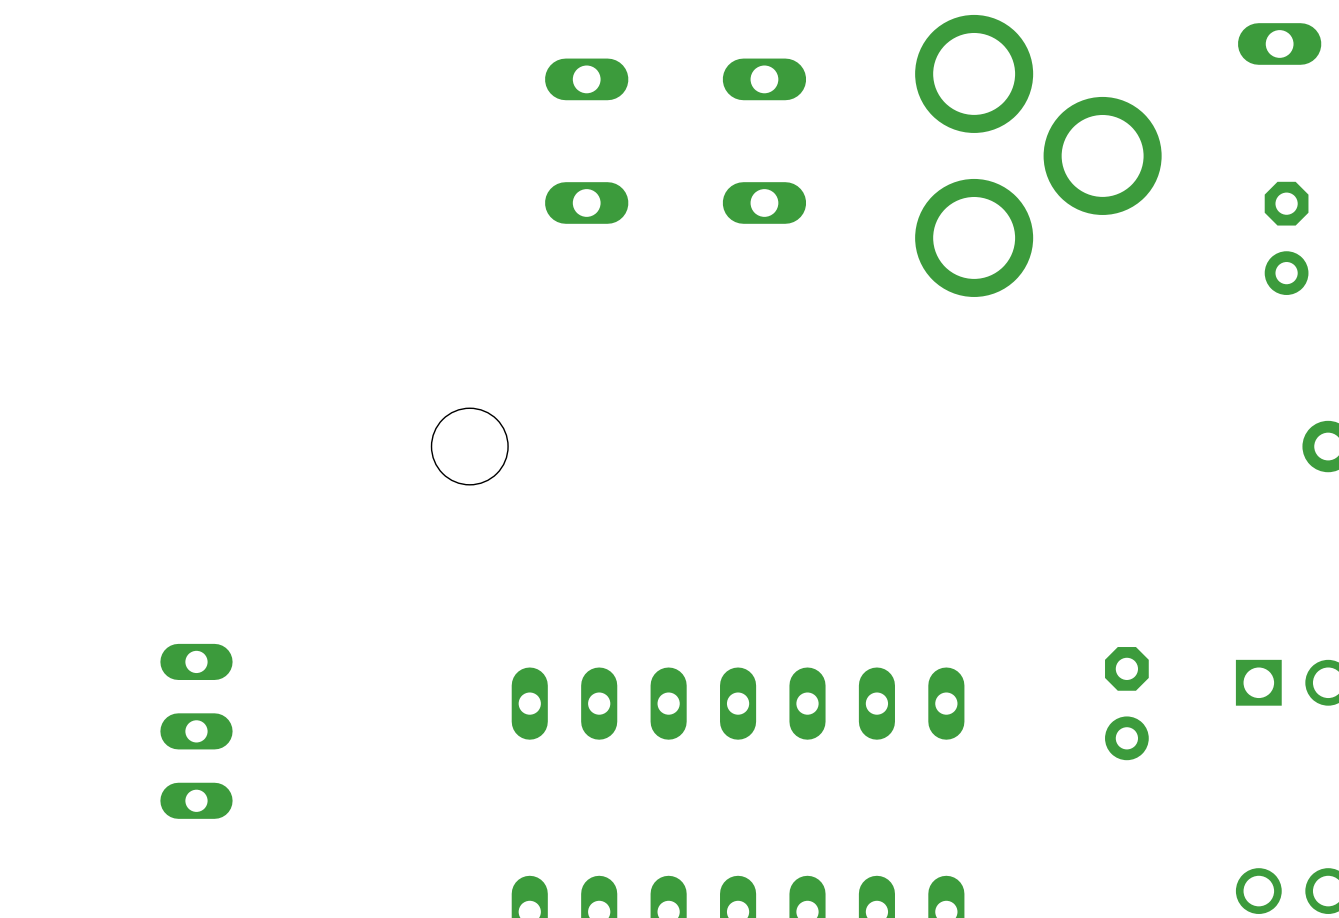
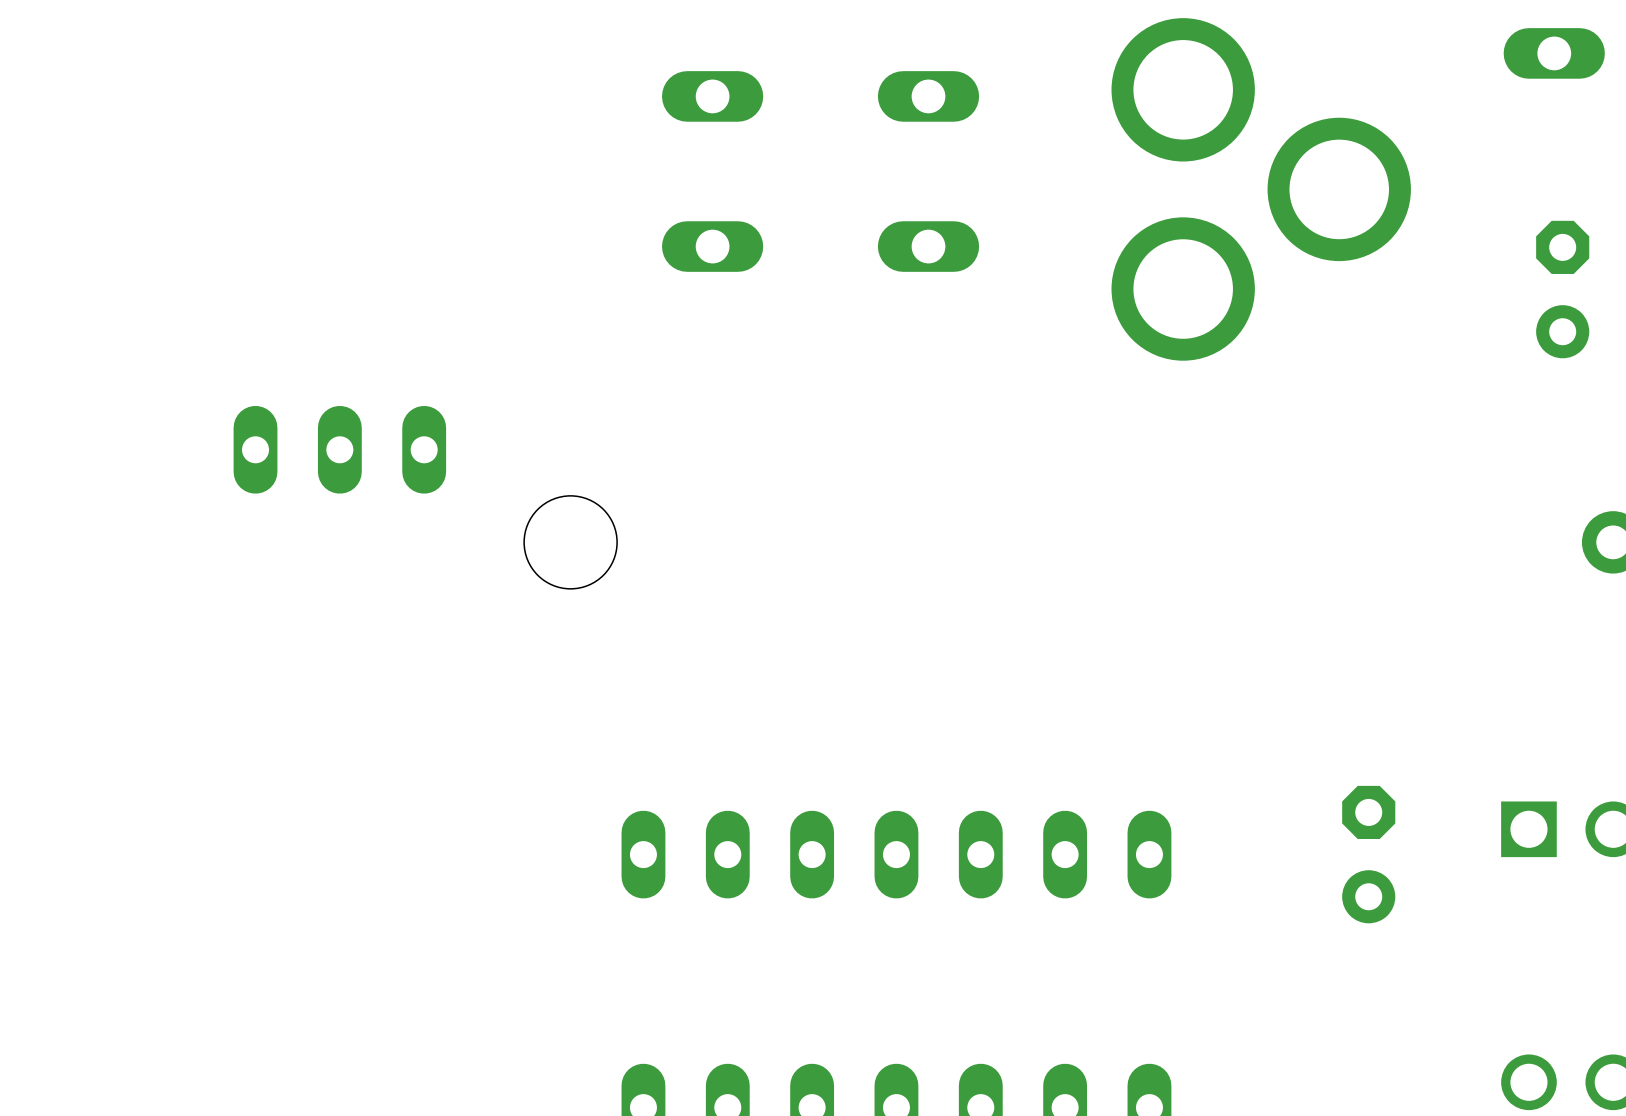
part rotation: 0° (196, 731) -> 90° clockwise (339, 449)
part position: (196, 731) -> (339, 449)

